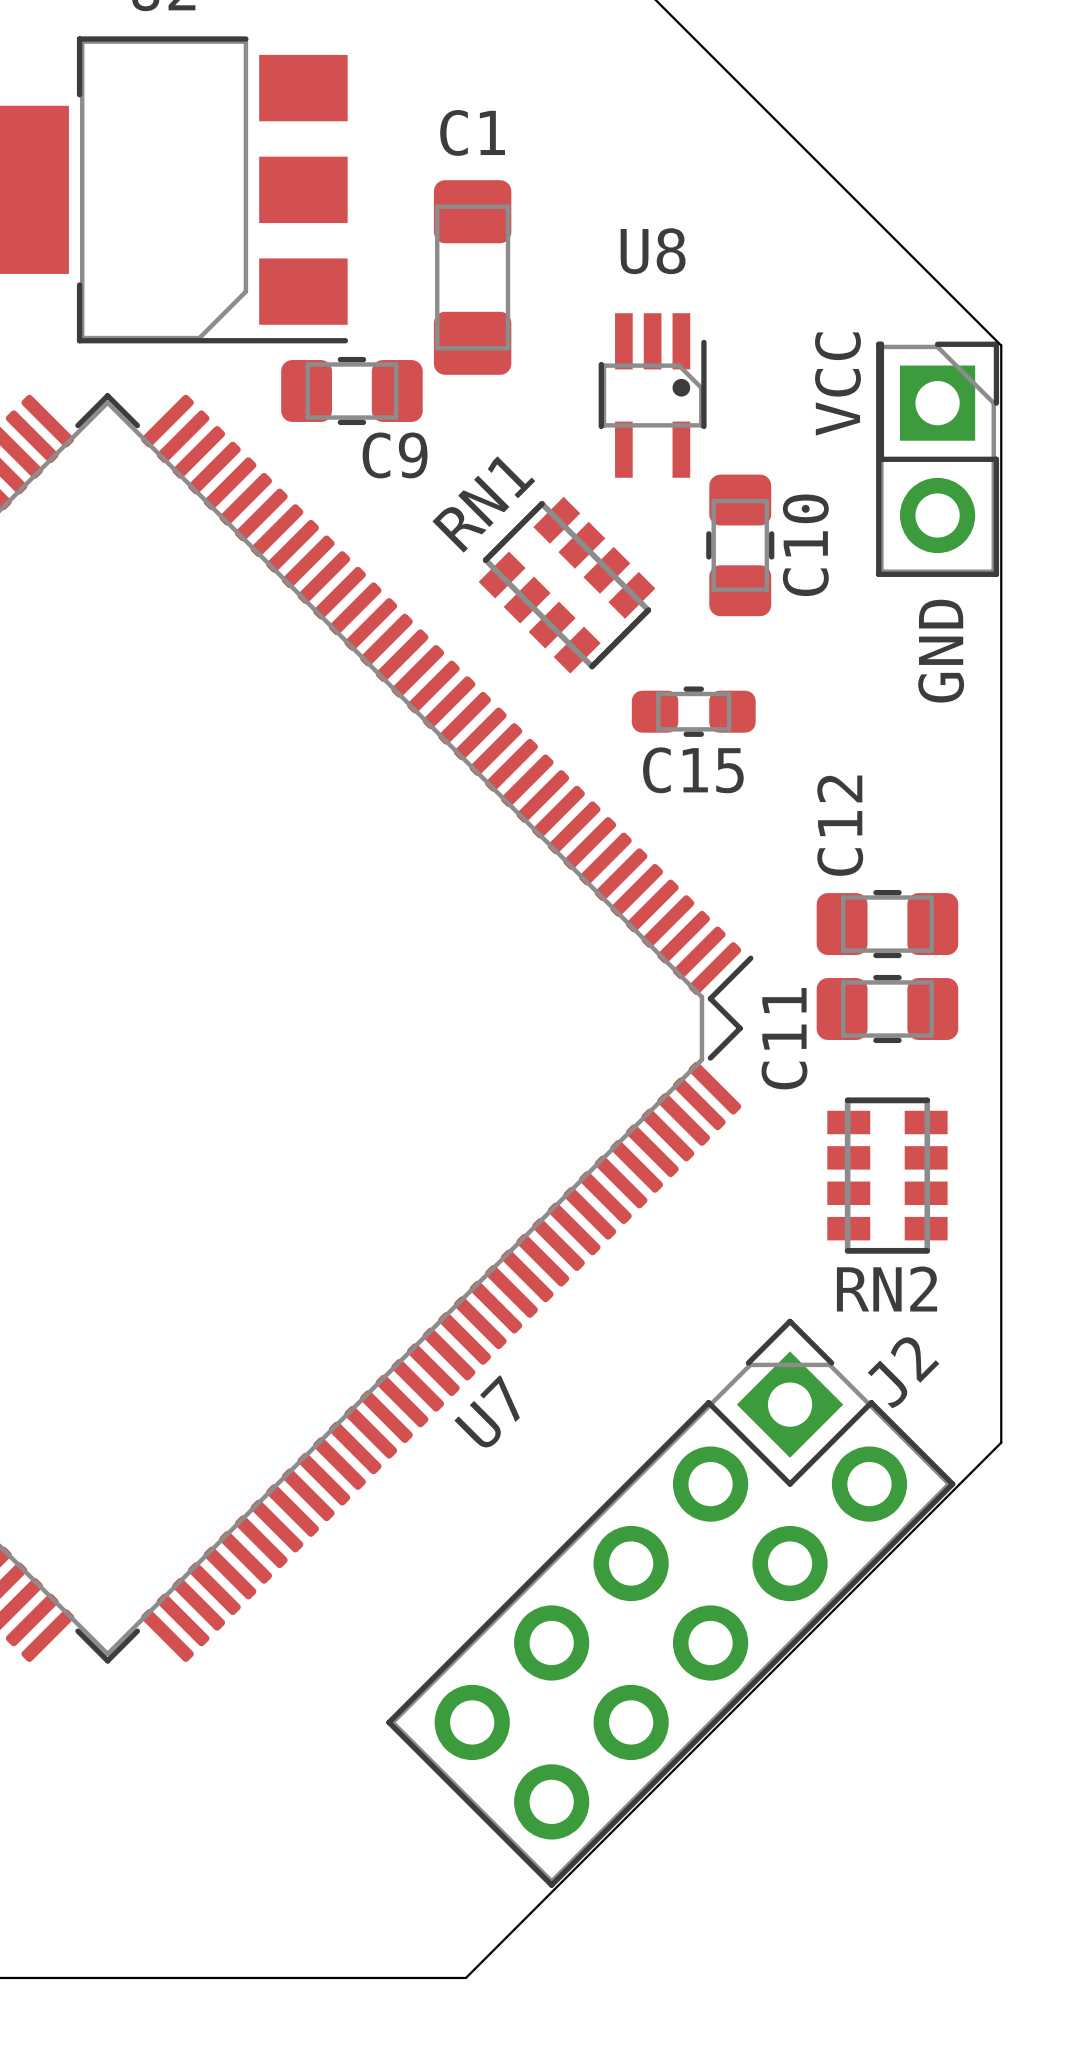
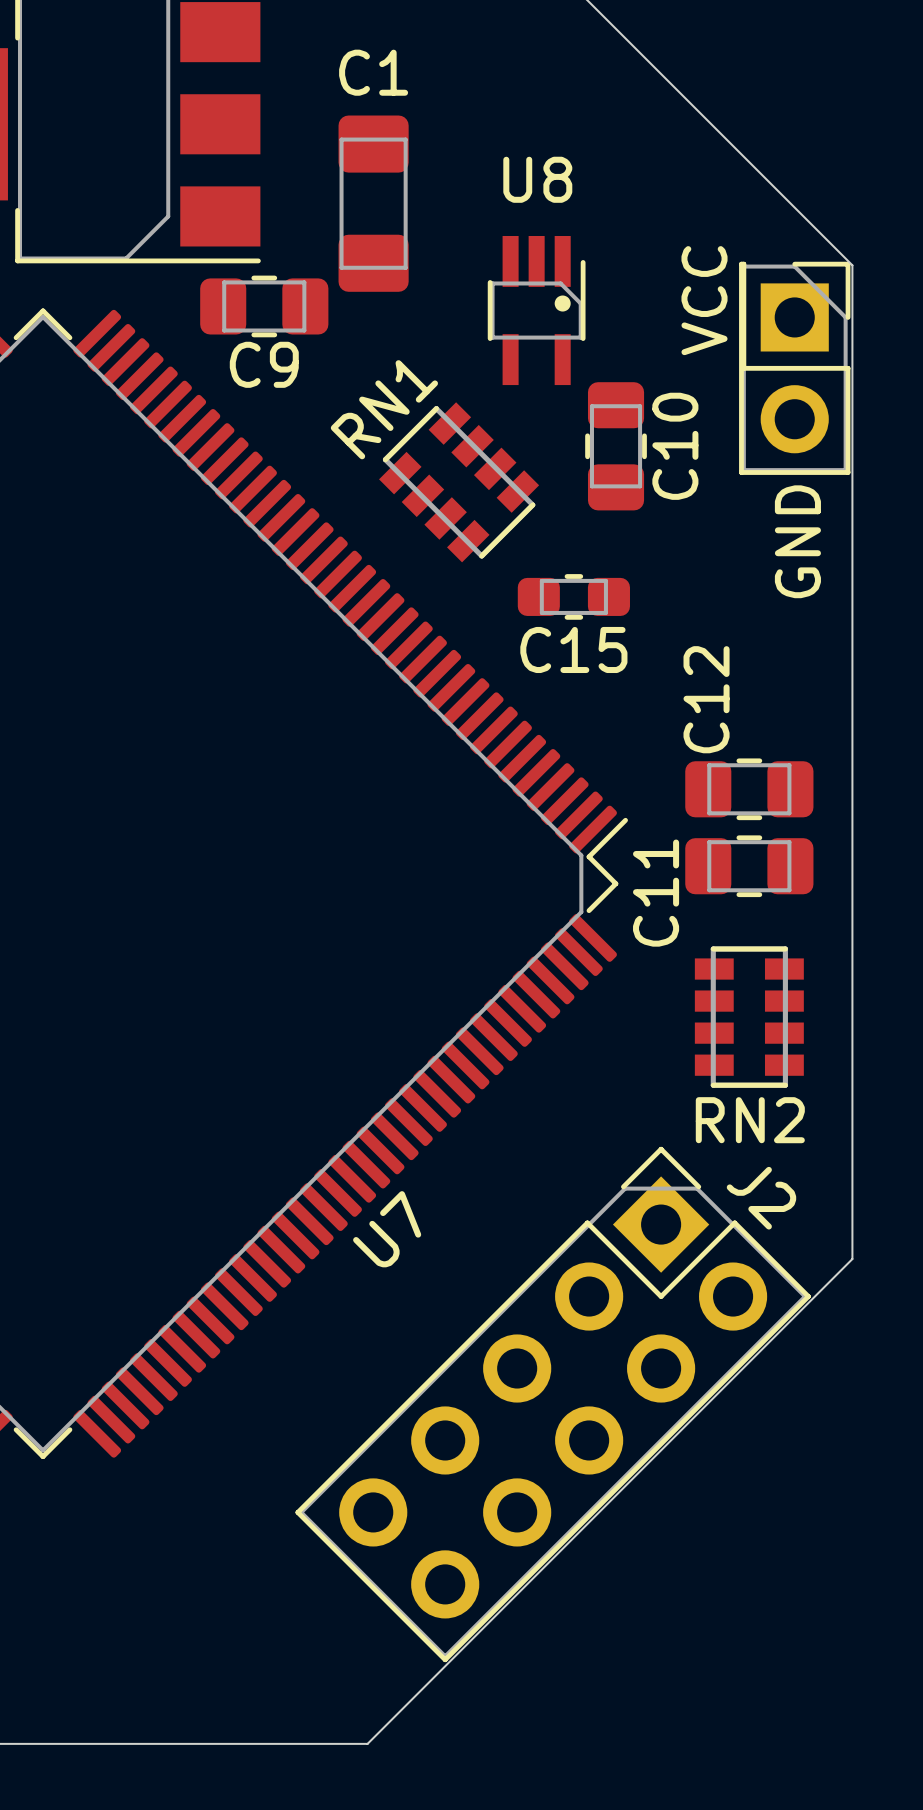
C9 name position: C9 (395, 455) -> C9 (264, 364)
J2 name rotation: 0° (903, 1372) -> 90° clockwise (761, 1198)

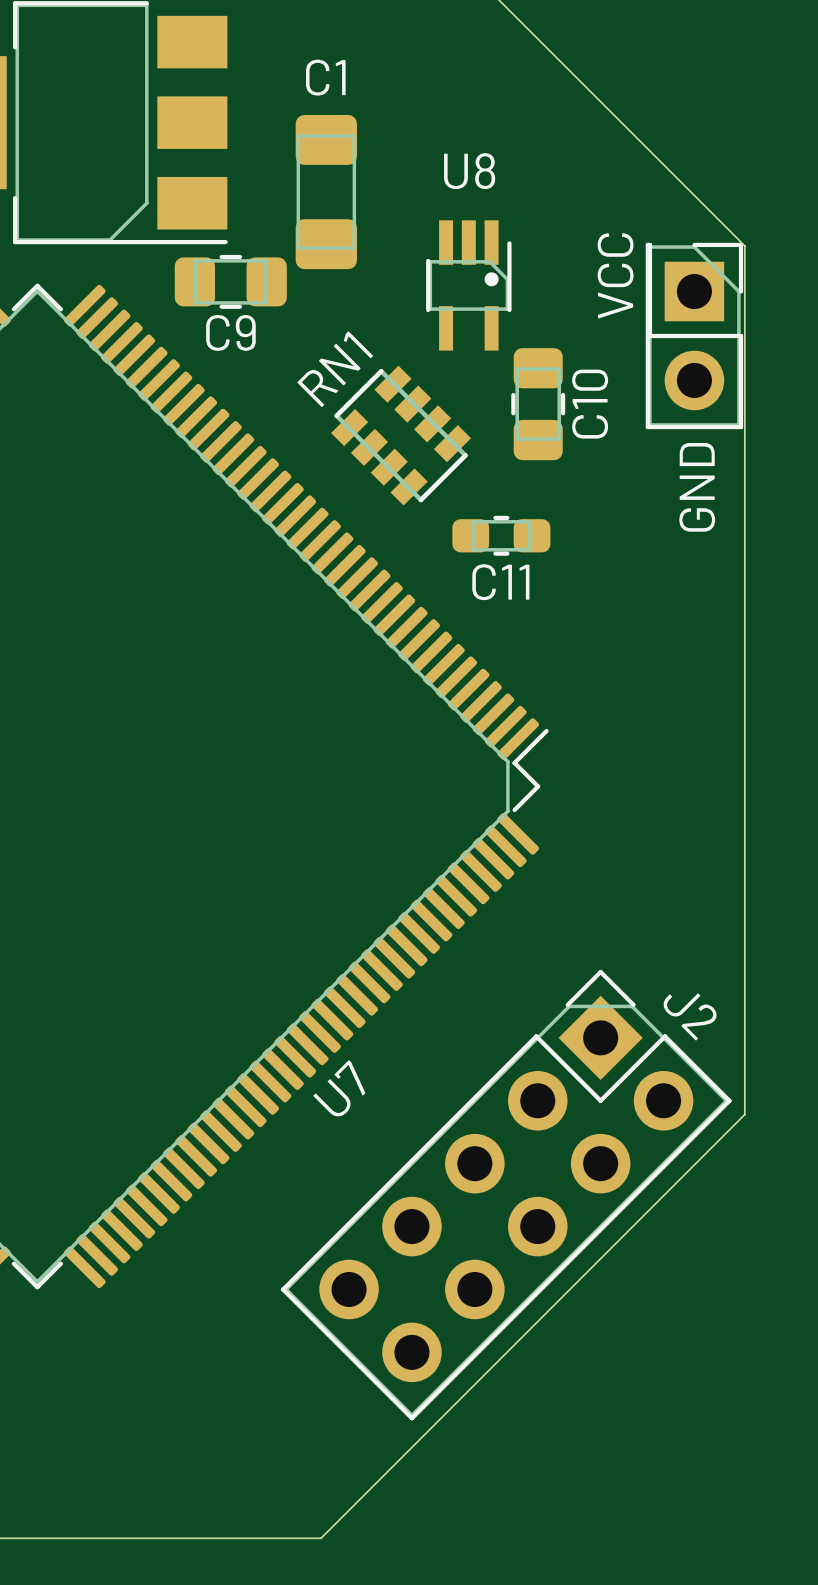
C15 name: C15 (573, 649) -> C11 (500, 582)
C12: (749, 789) -> none
C11: (749, 866) -> none
RN2: (749, 1017) -> none
J2 position: (553, 1404) -> (506, 1195)

